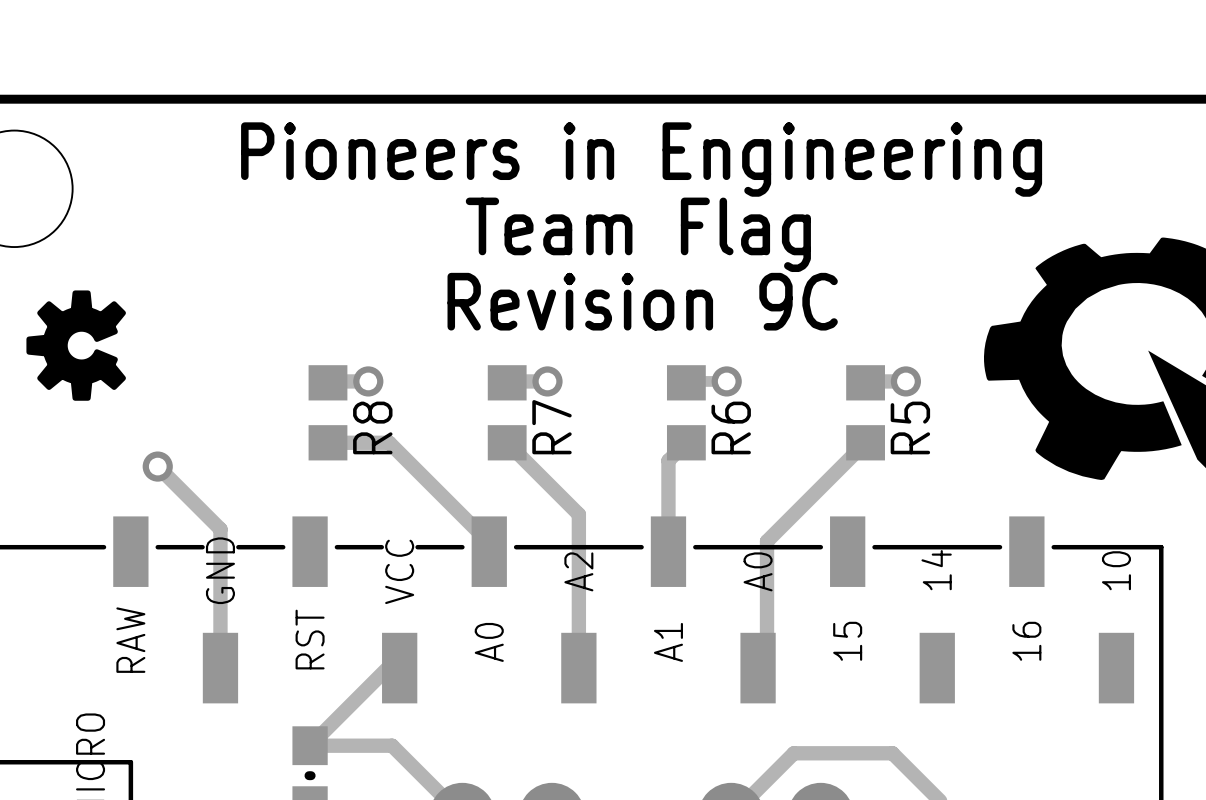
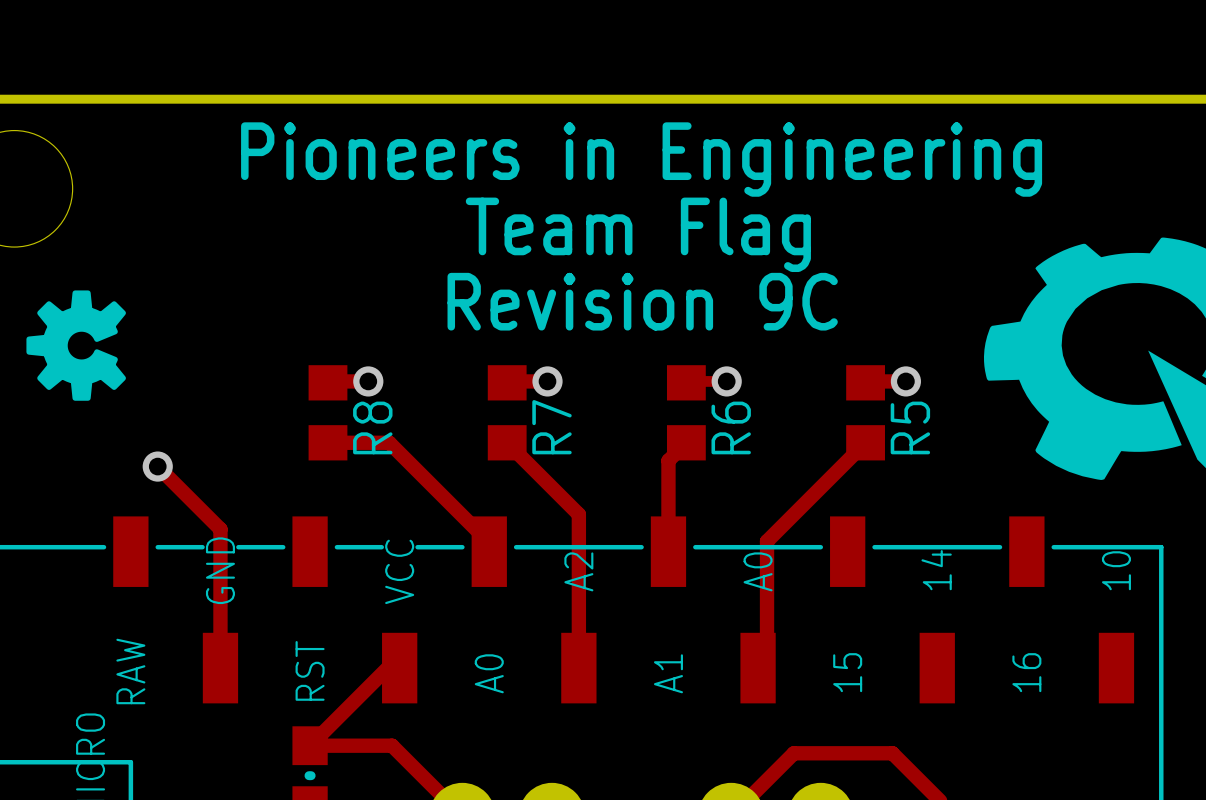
part text position: RST (310, 639) -> RST (310, 670)
part text position: RAW (130, 640) -> RAW (130, 671)
part text position: 15 (847, 641) -> 15 (847, 672)
part text position: 16 (1026, 641) -> 16 (1026, 672)
part text position: A0 (489, 642) -> A0 (489, 673)
part text position: A1 (668, 642) -> A1 (668, 673)

